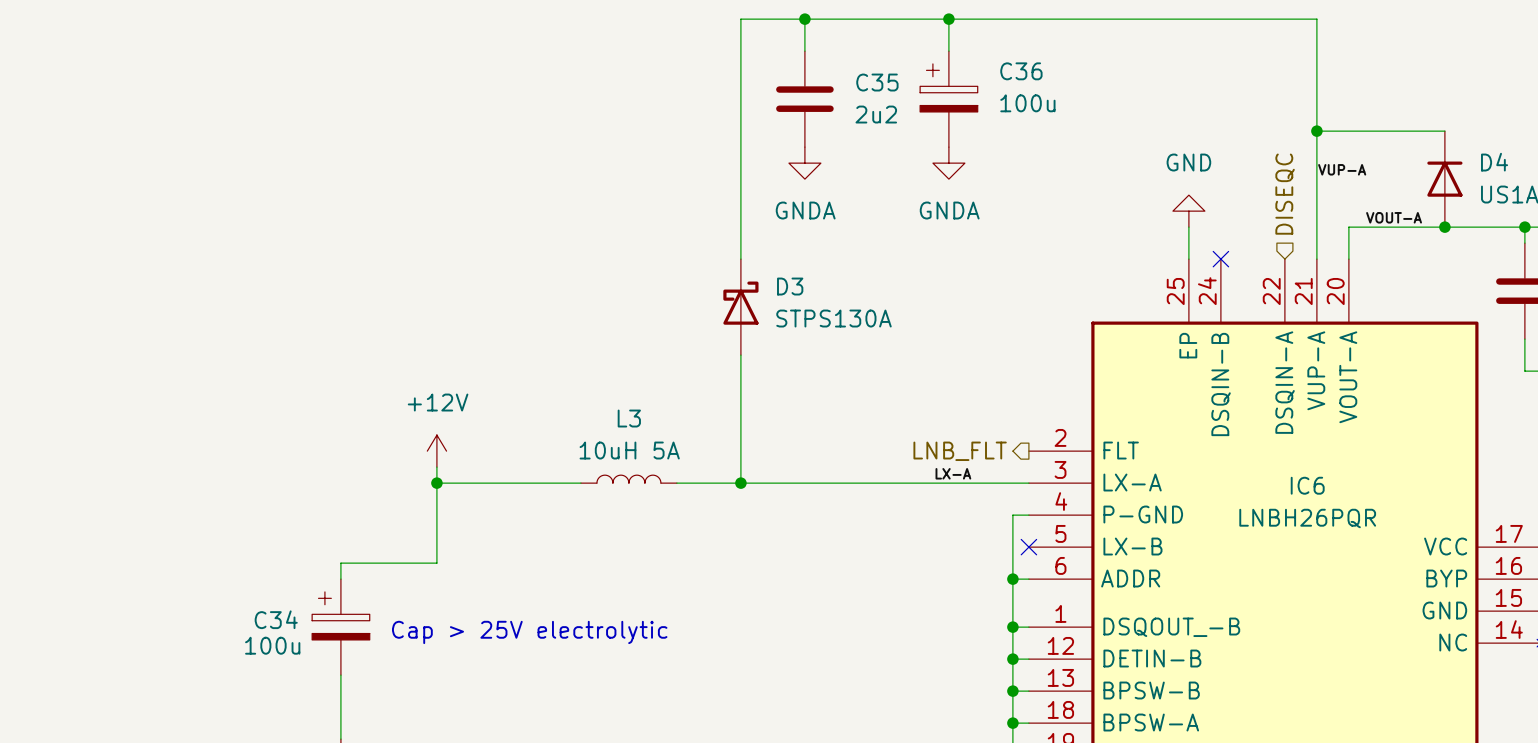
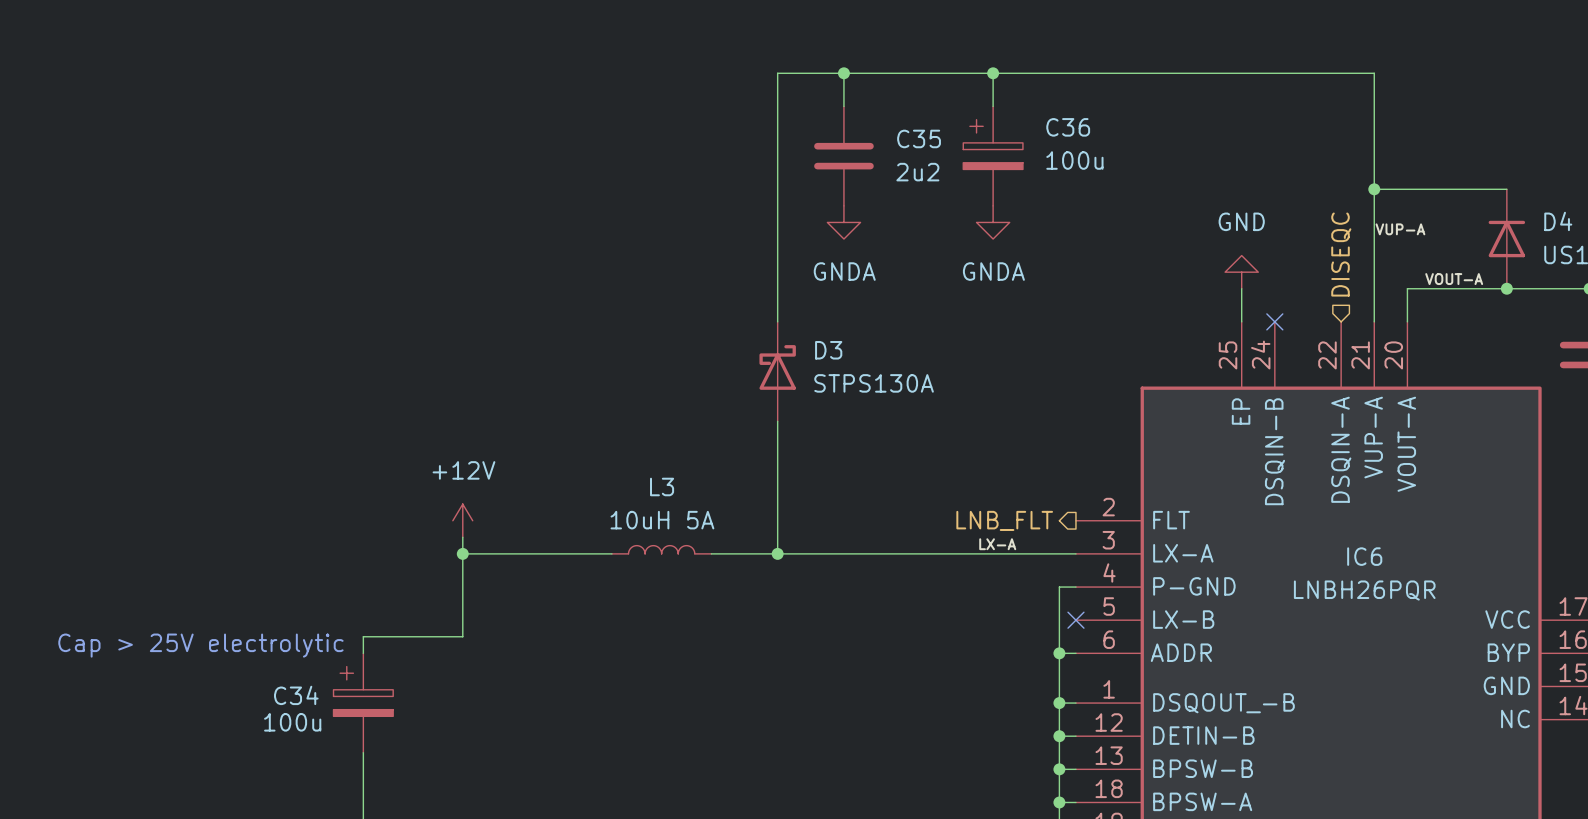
text: none -> Cap > 25V electrolytic (200, 645)
text: Cap > 25V electrolytic (529, 632) -> none

